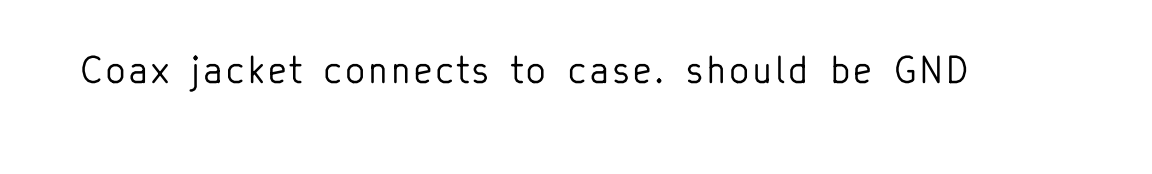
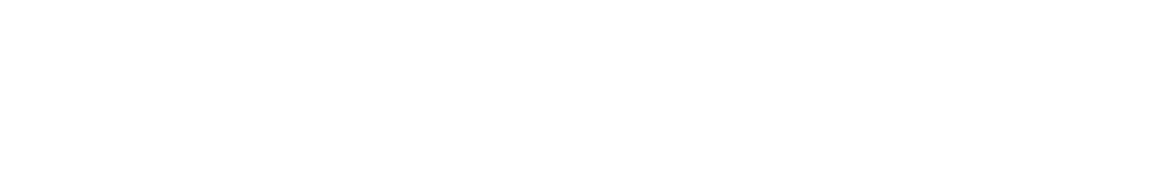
text: Coax jacket connects to case. should be GND (524, 73) -> none

